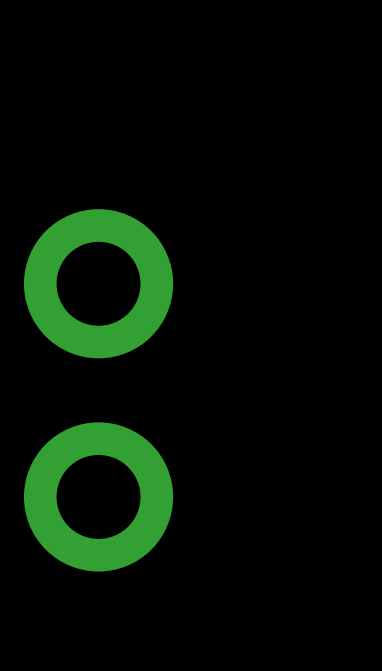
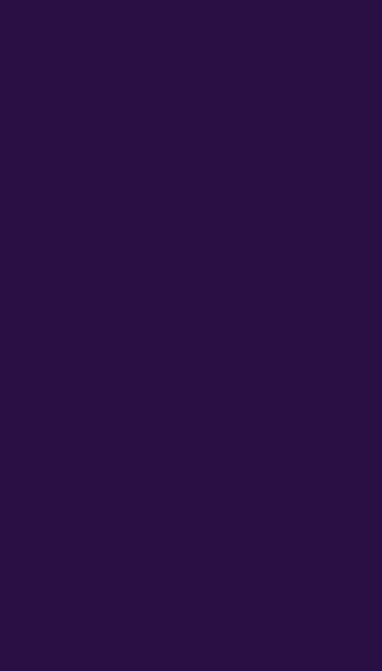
part: (98, 390) -> none

